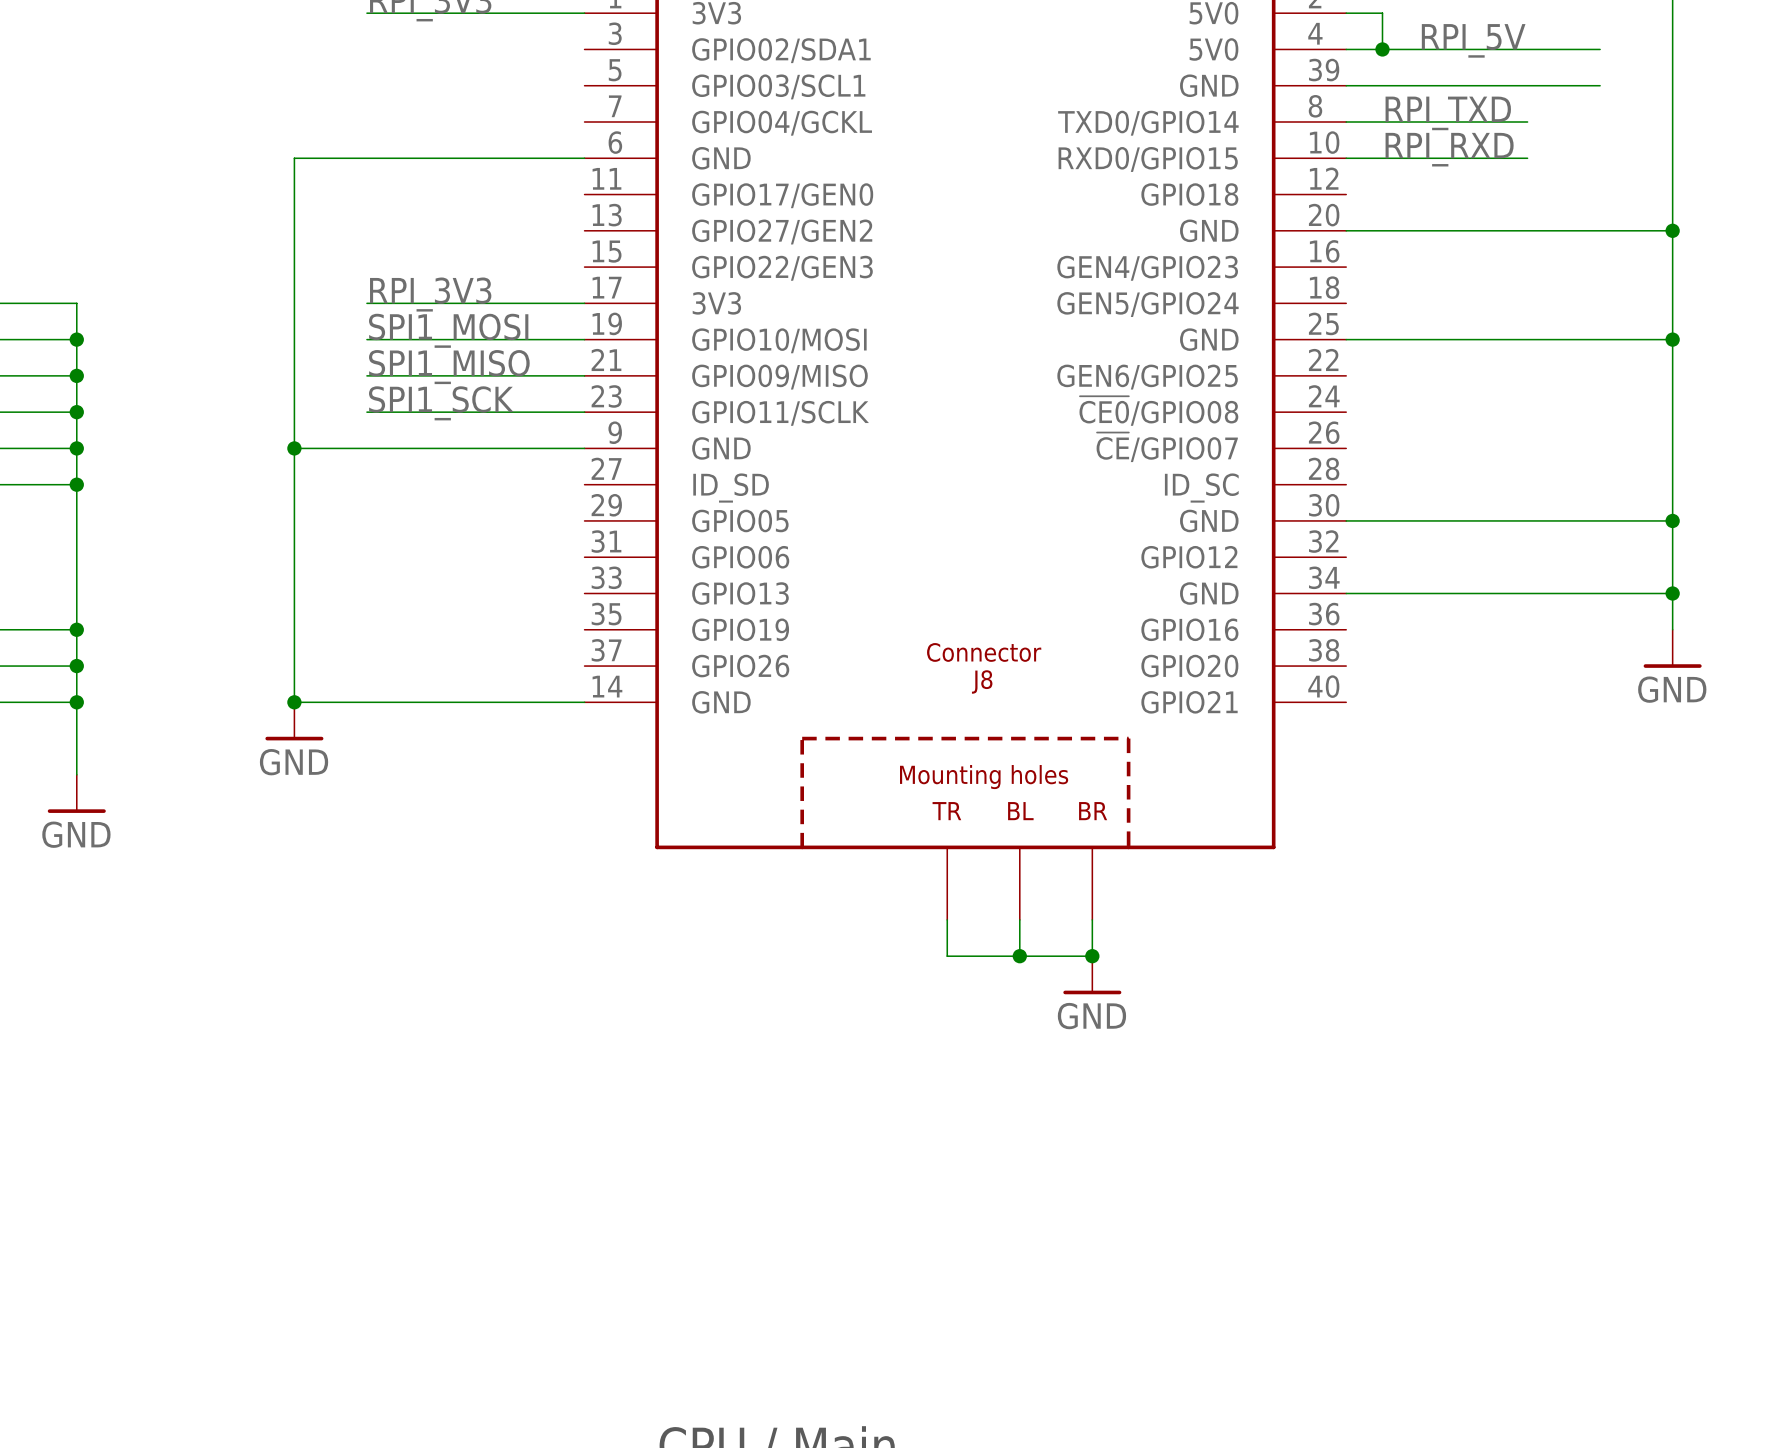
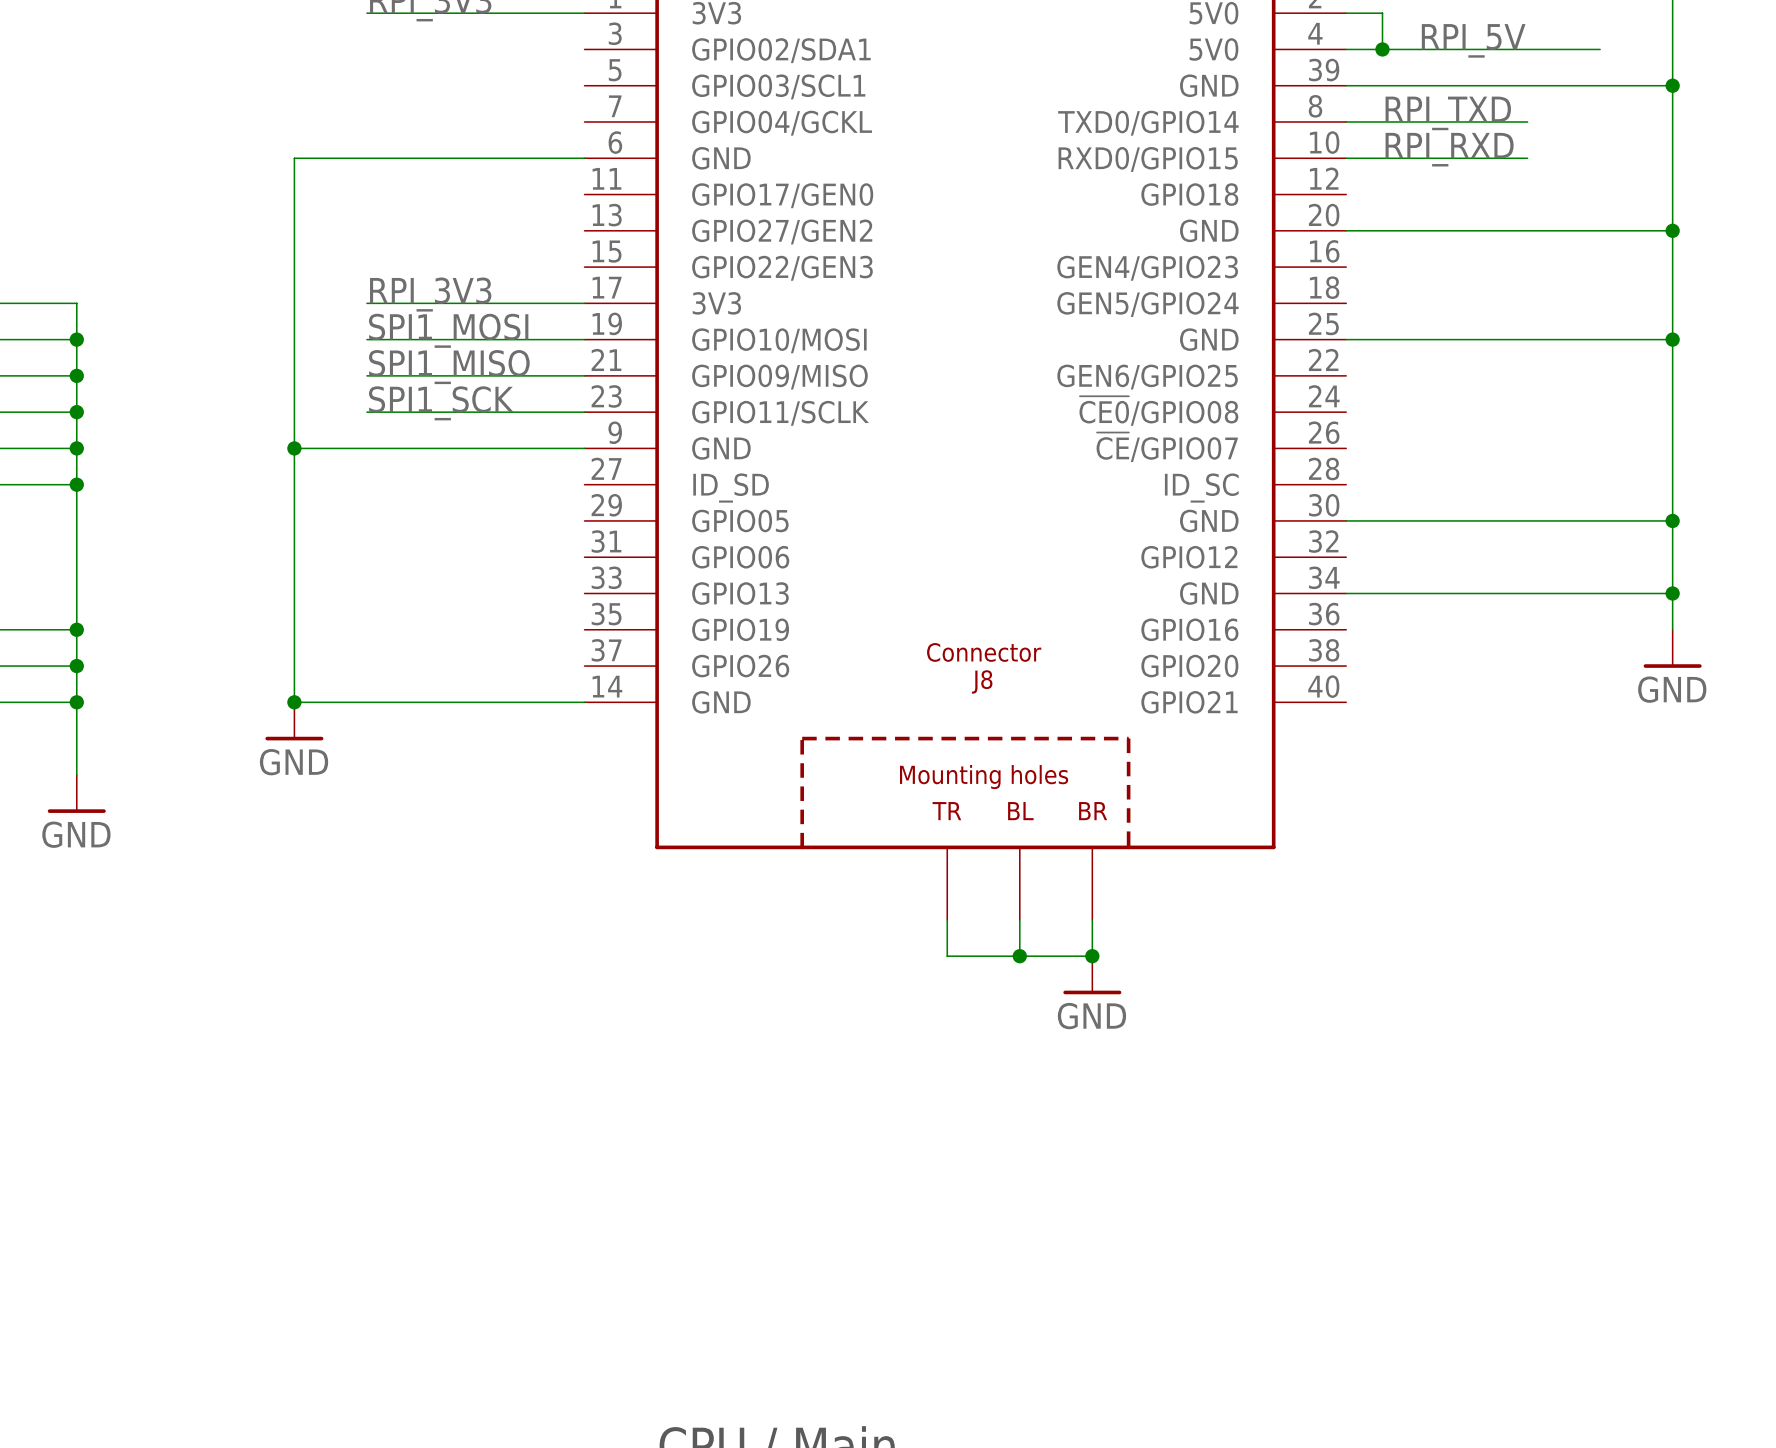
wire: none -> (1600, 85) (1672, 85)
junction: none -> (1672, 85)

